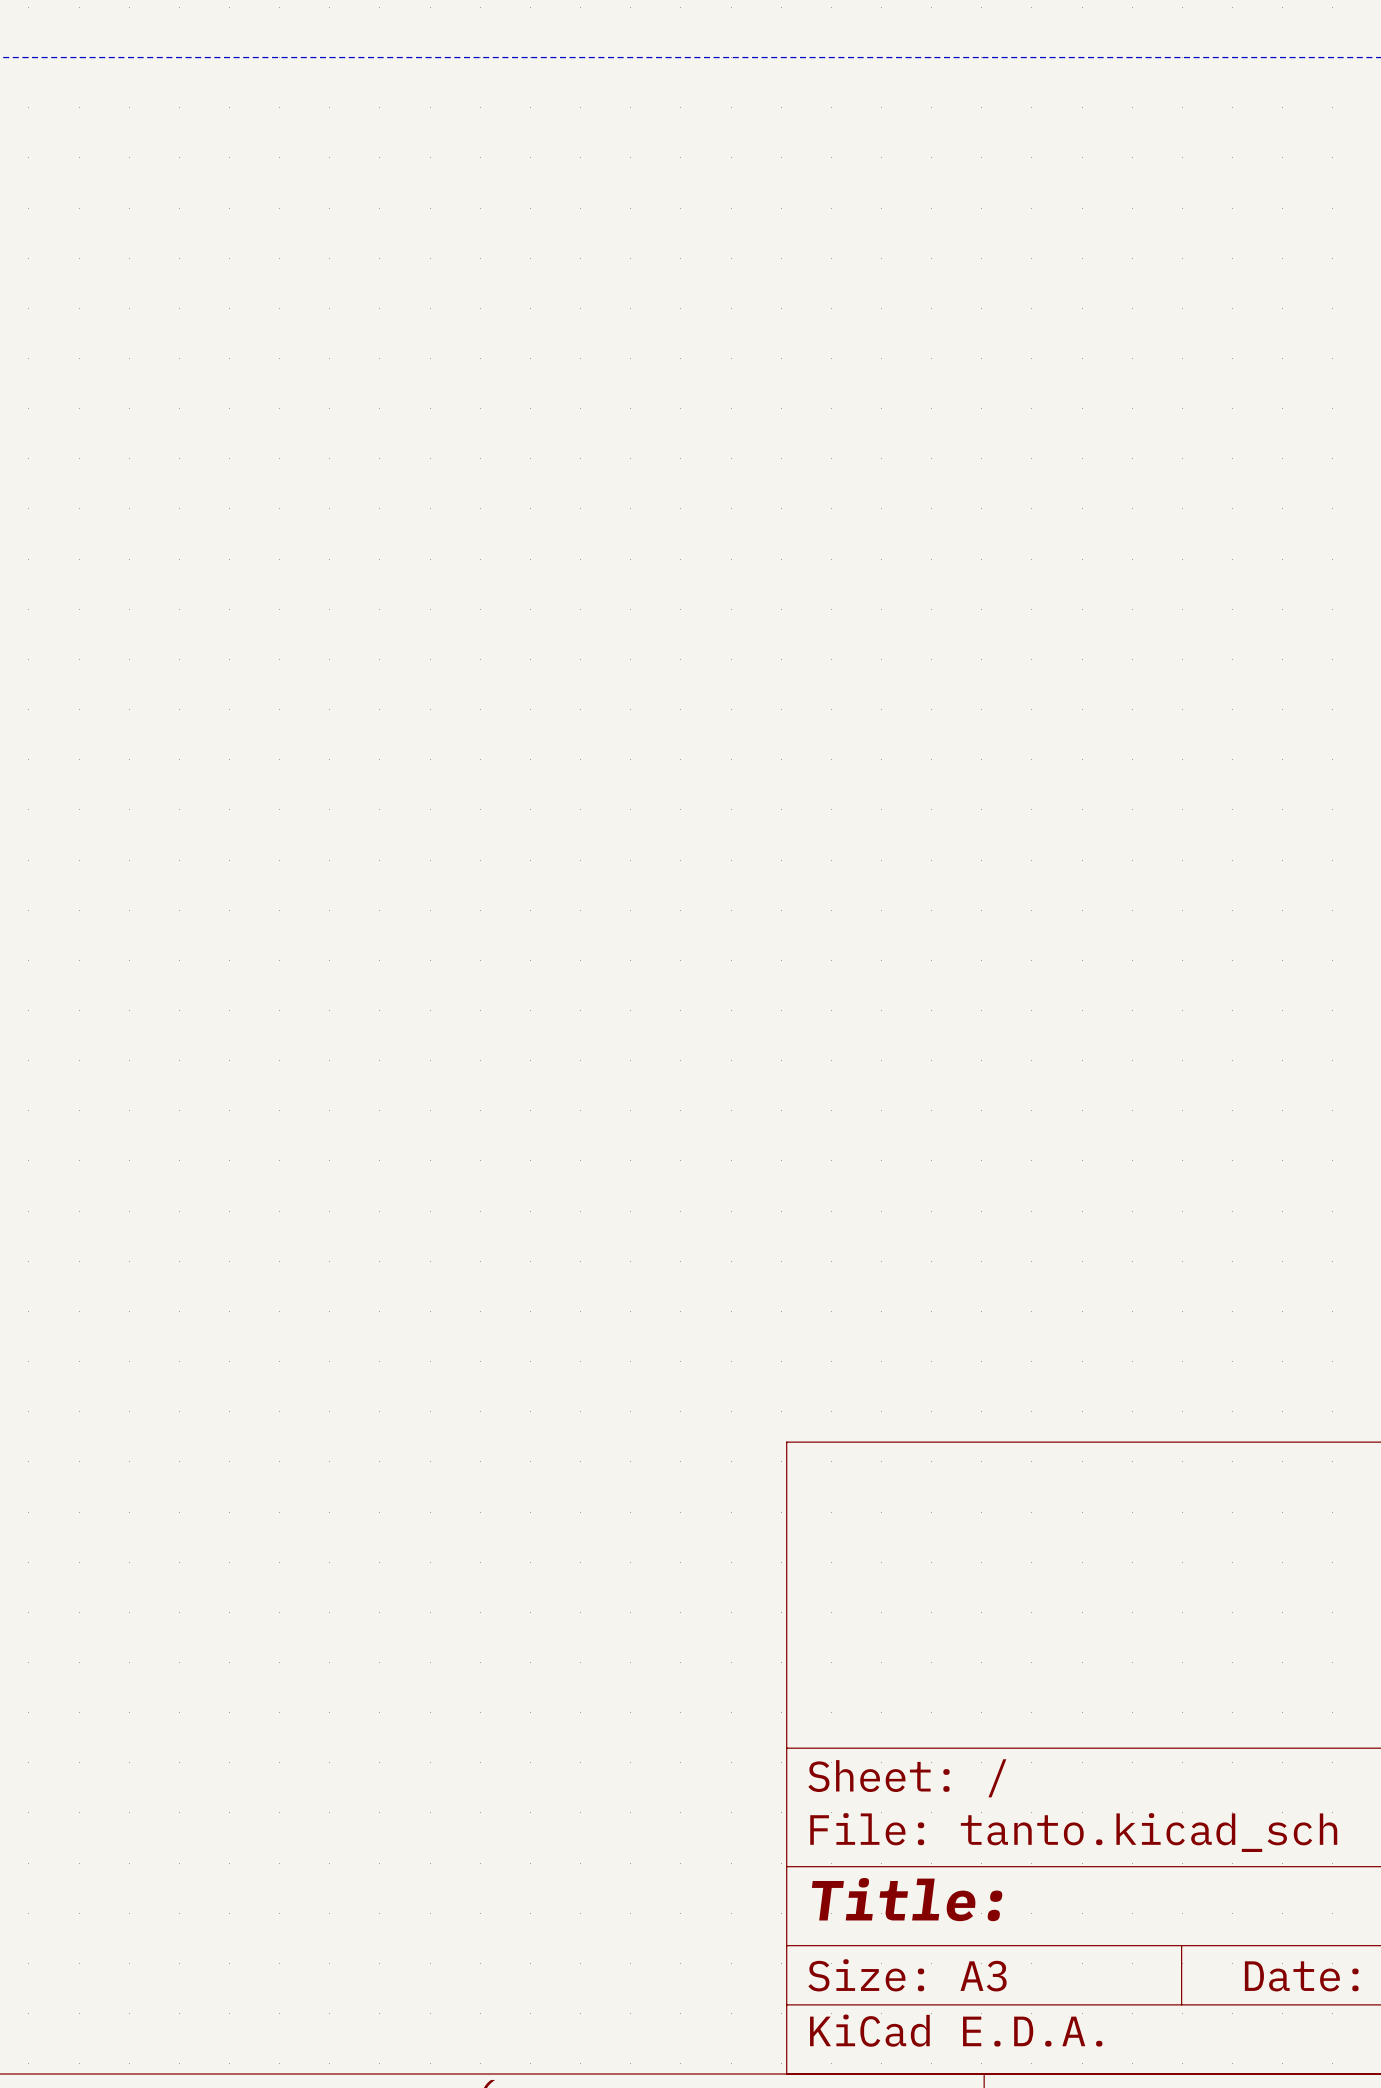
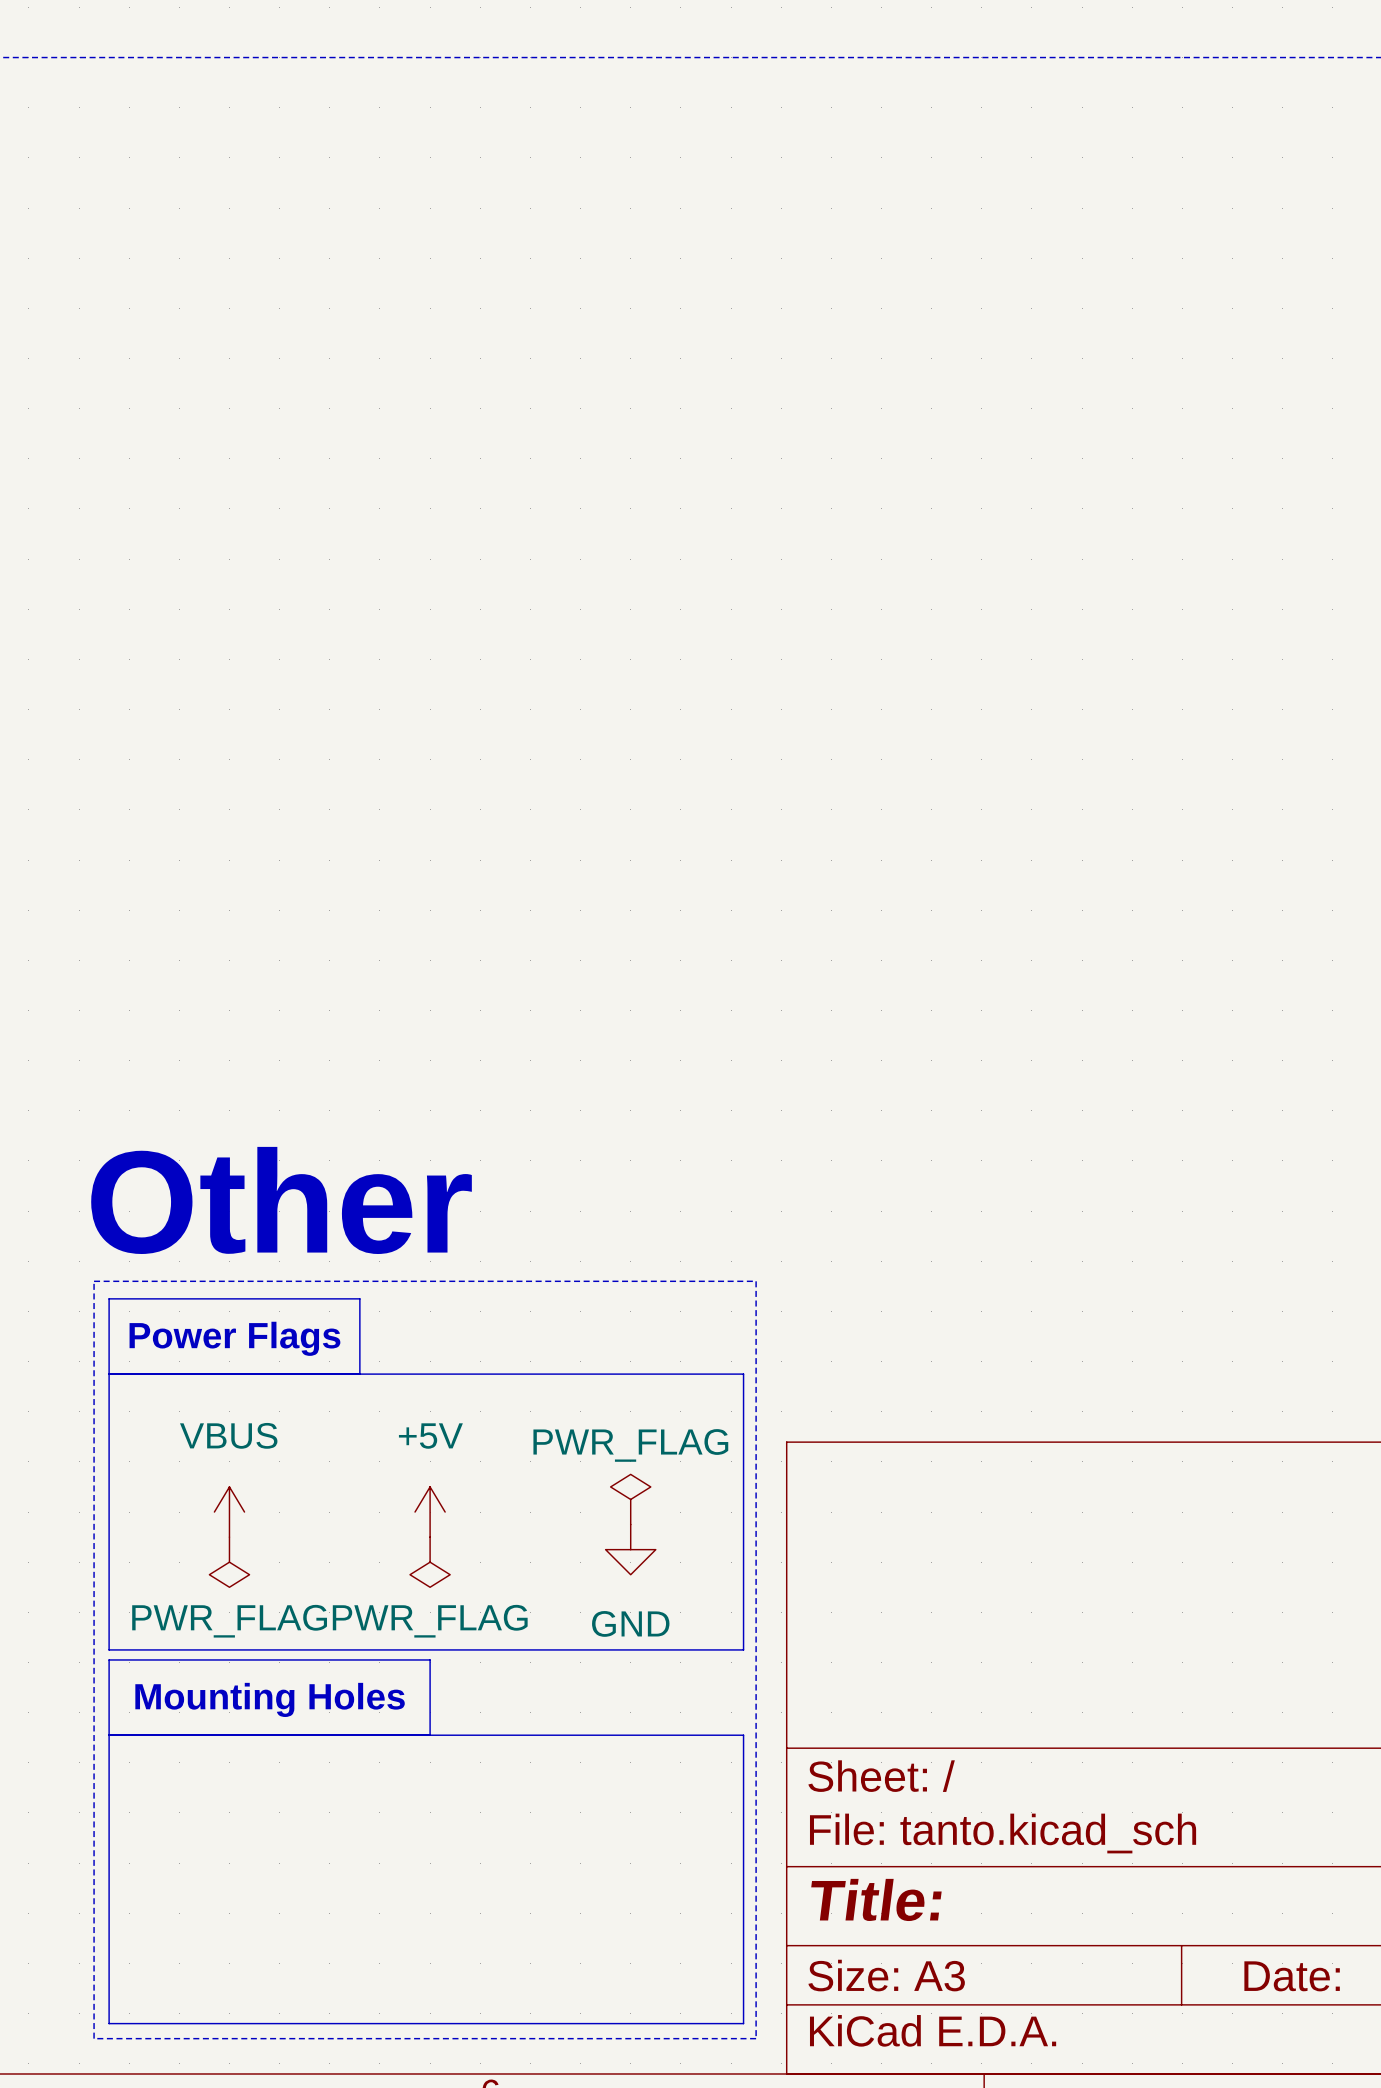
text: none -> Other (281, 1200)
line: none -> (94, 1281) (756, 1281) (756, 2038) (94, 2038) (94, 1281)
text: none -> Power Flags (234, 1338)
line: none -> (109, 1374) (743, 1374) (743, 1649) (109, 1649) (109, 1298) (359, 1298) (359, 1374)
power symbol: none -> PWR_FLAG (630, 1499)
power symbol: none -> VBUS (229, 1512)
power symbol: none -> +5V (430, 1512)
power symbol: none -> GND (630, 1549)
power symbol: none -> PWR_FLAG (229, 1562)
power symbol: none -> PWR_FLAG (430, 1562)
text: none -> Mounting Holes (270, 1699)
line: none -> (109, 1735) (743, 1735) (743, 2023) (109, 2023) (109, 1659) (430, 1659) (430, 1735)

